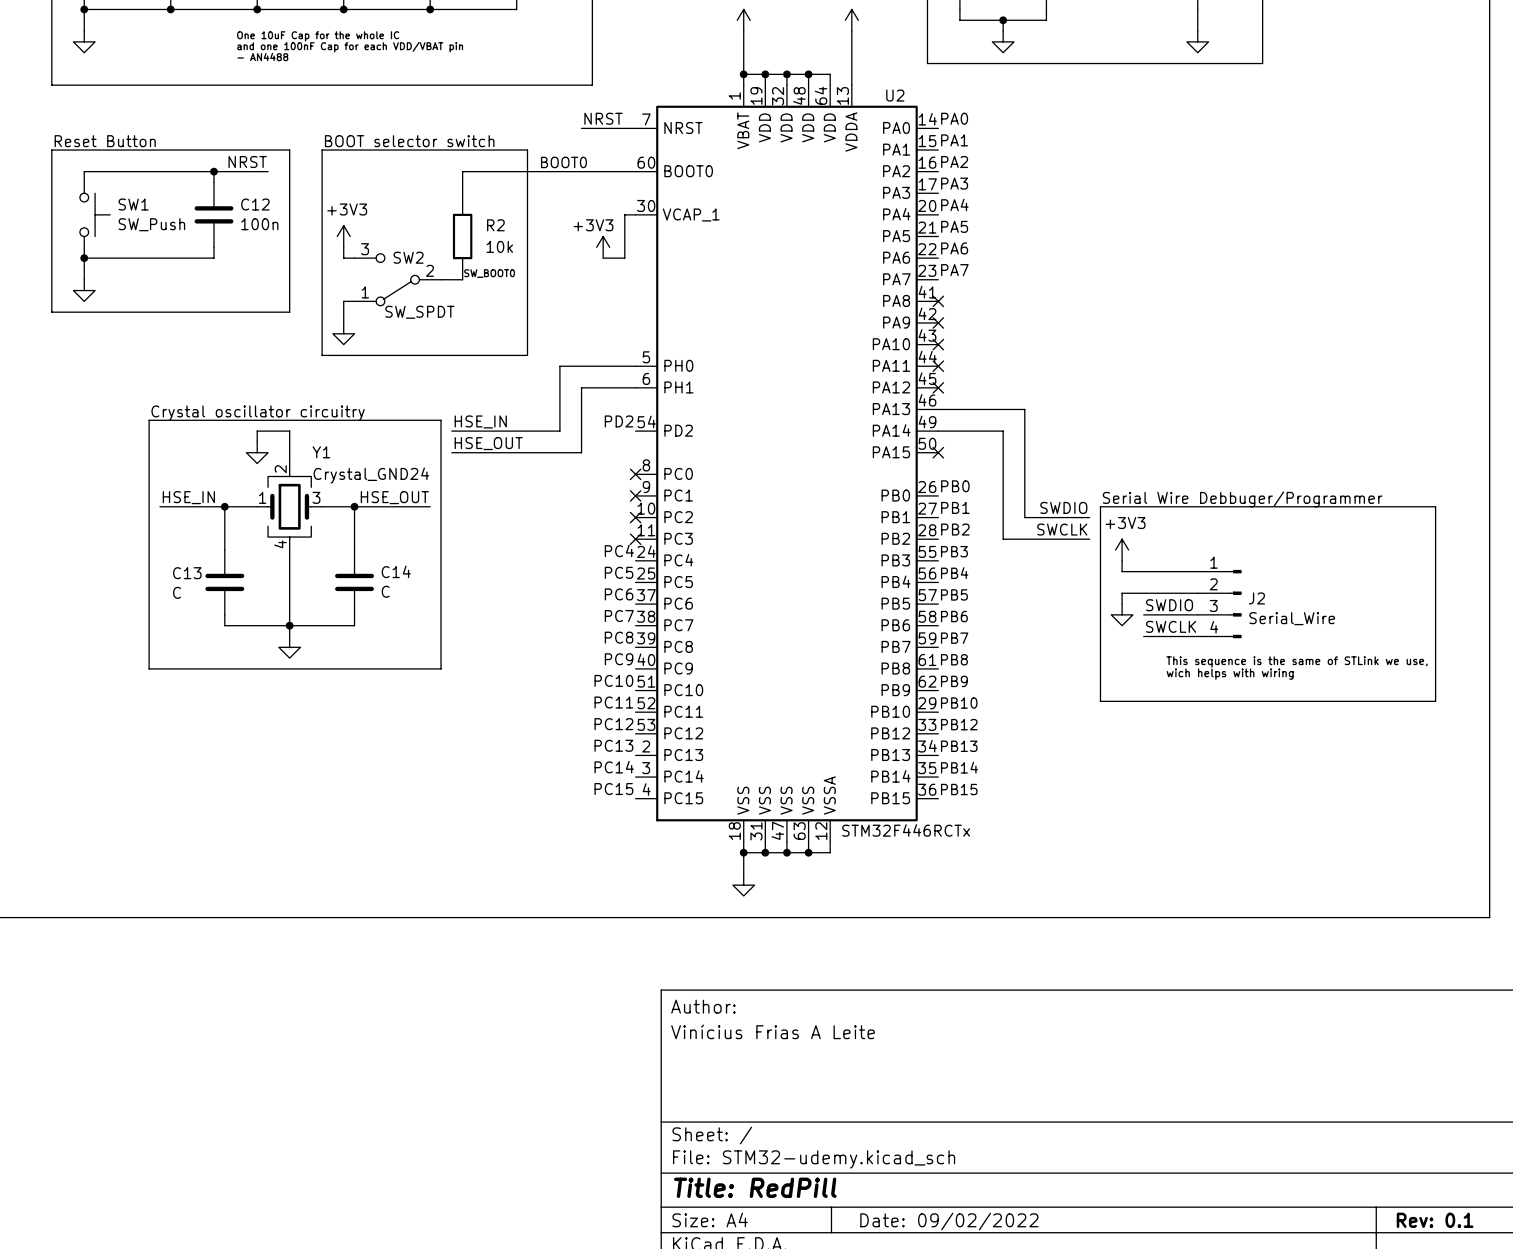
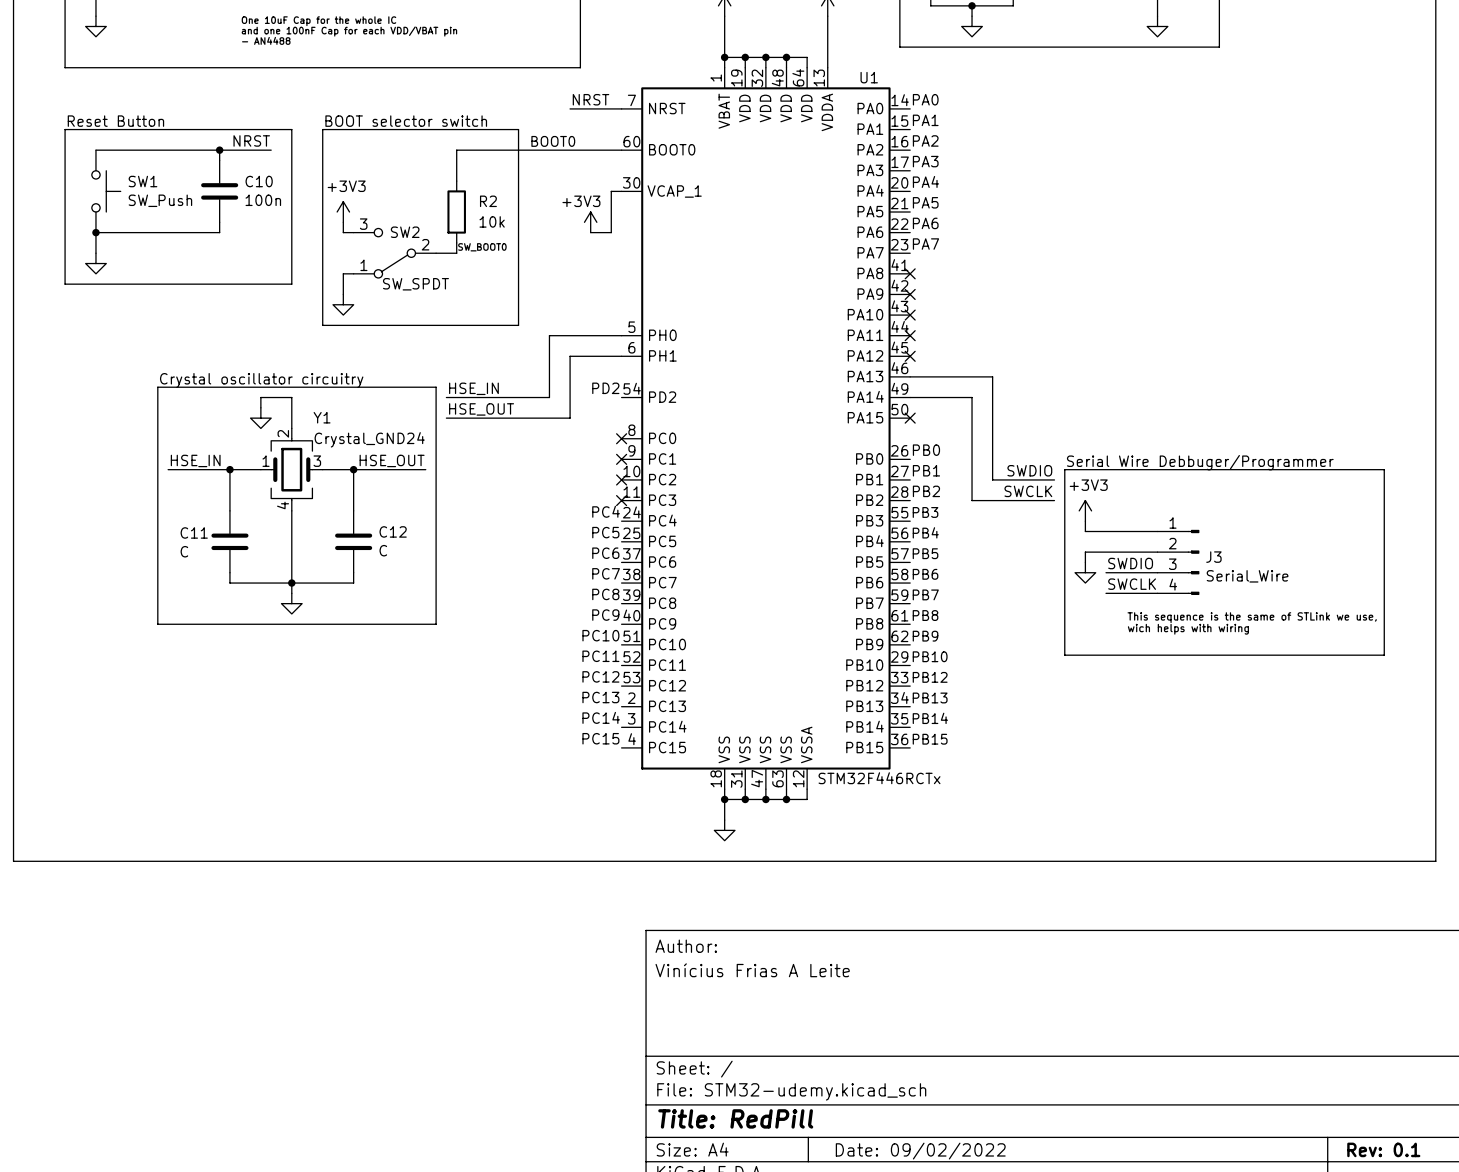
U2 name: U2 (895, 95) -> U1 (869, 77)
C12 name: C12 (255, 204) -> C10 (259, 181)
C14 name: C14 (396, 571) -> C12 (393, 531)
C13 name: C13 (187, 573) -> C11 (194, 532)
J2 name: J2 (1256, 598) -> J3 (1213, 557)

